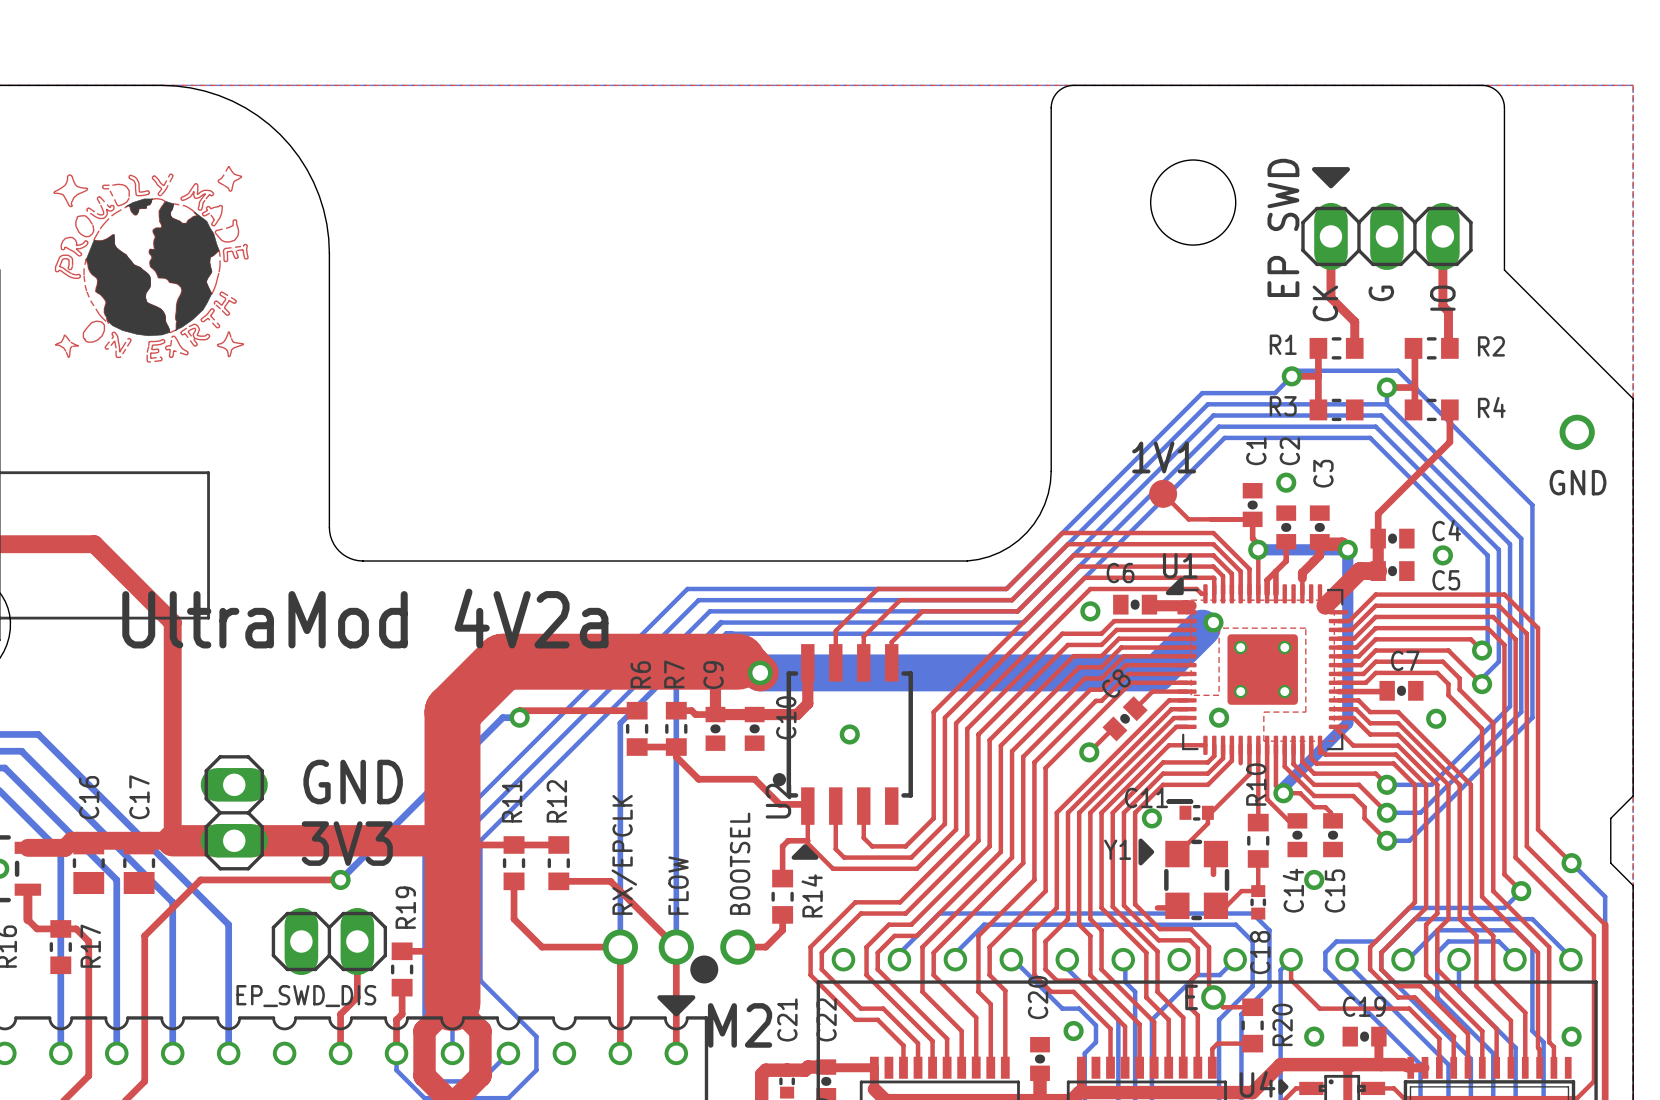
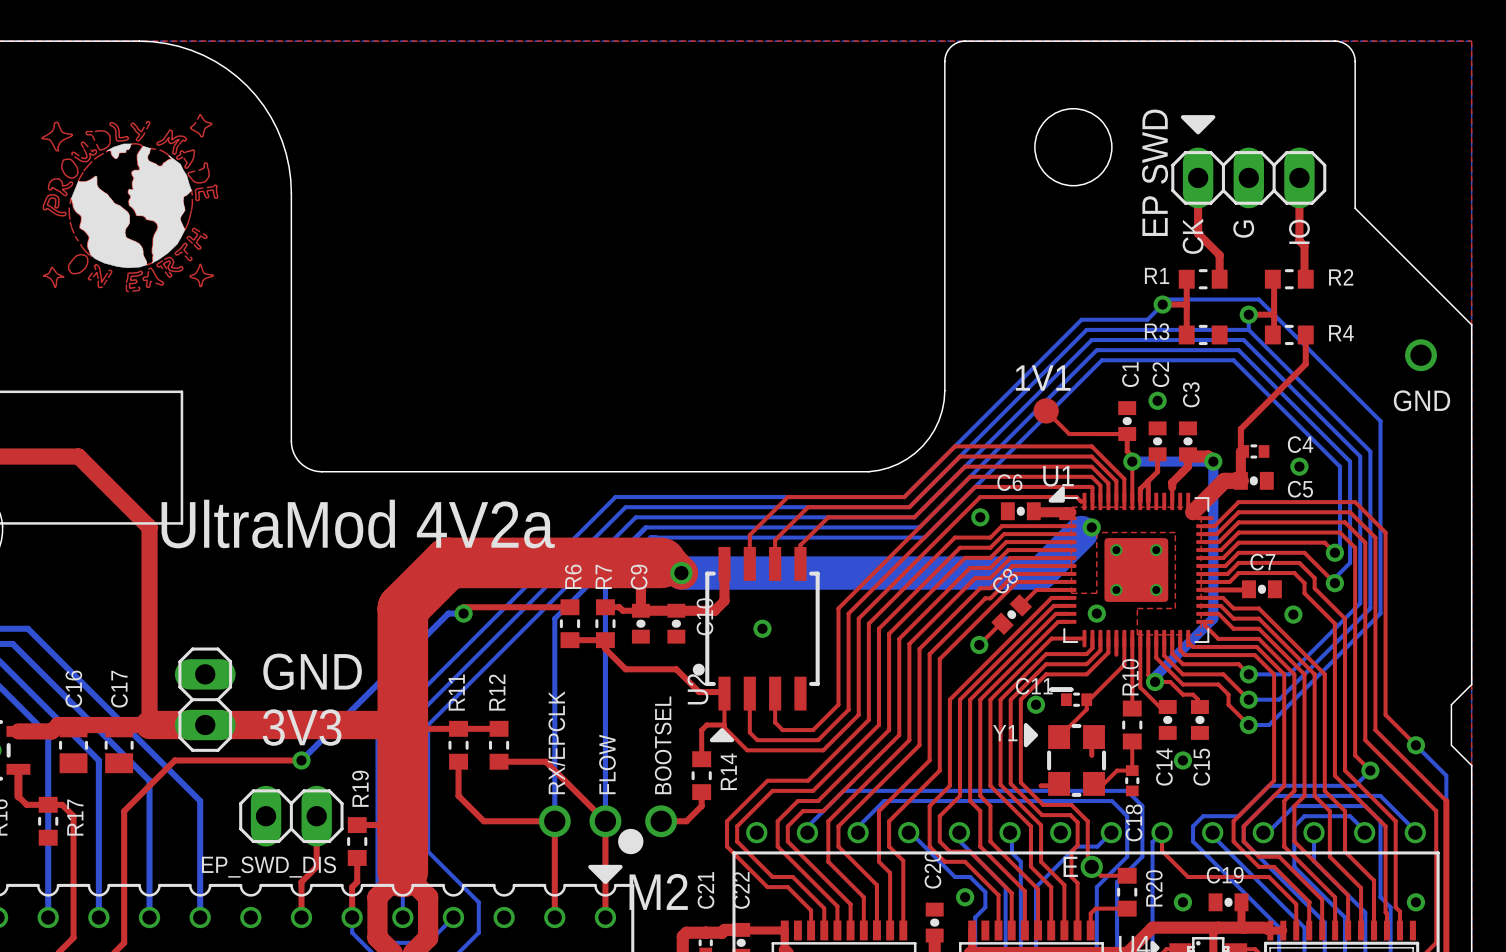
C4 footprint: [1370, 528, 1415, 549] -> [1238, 444, 1270, 459]

